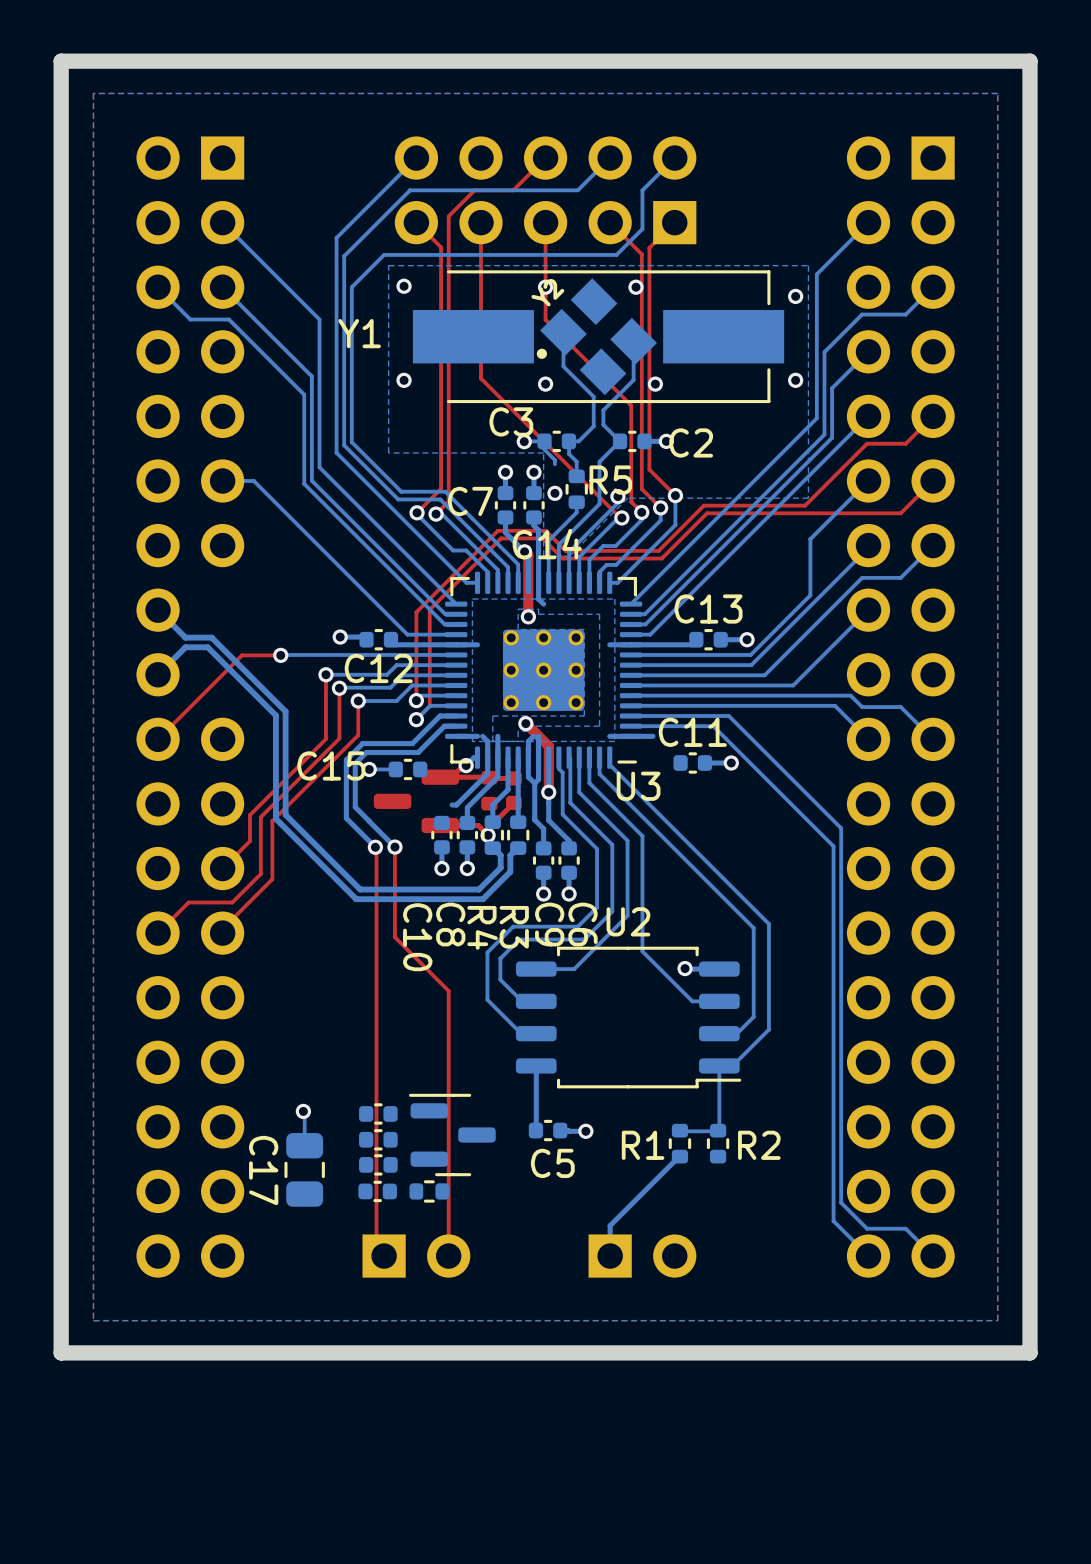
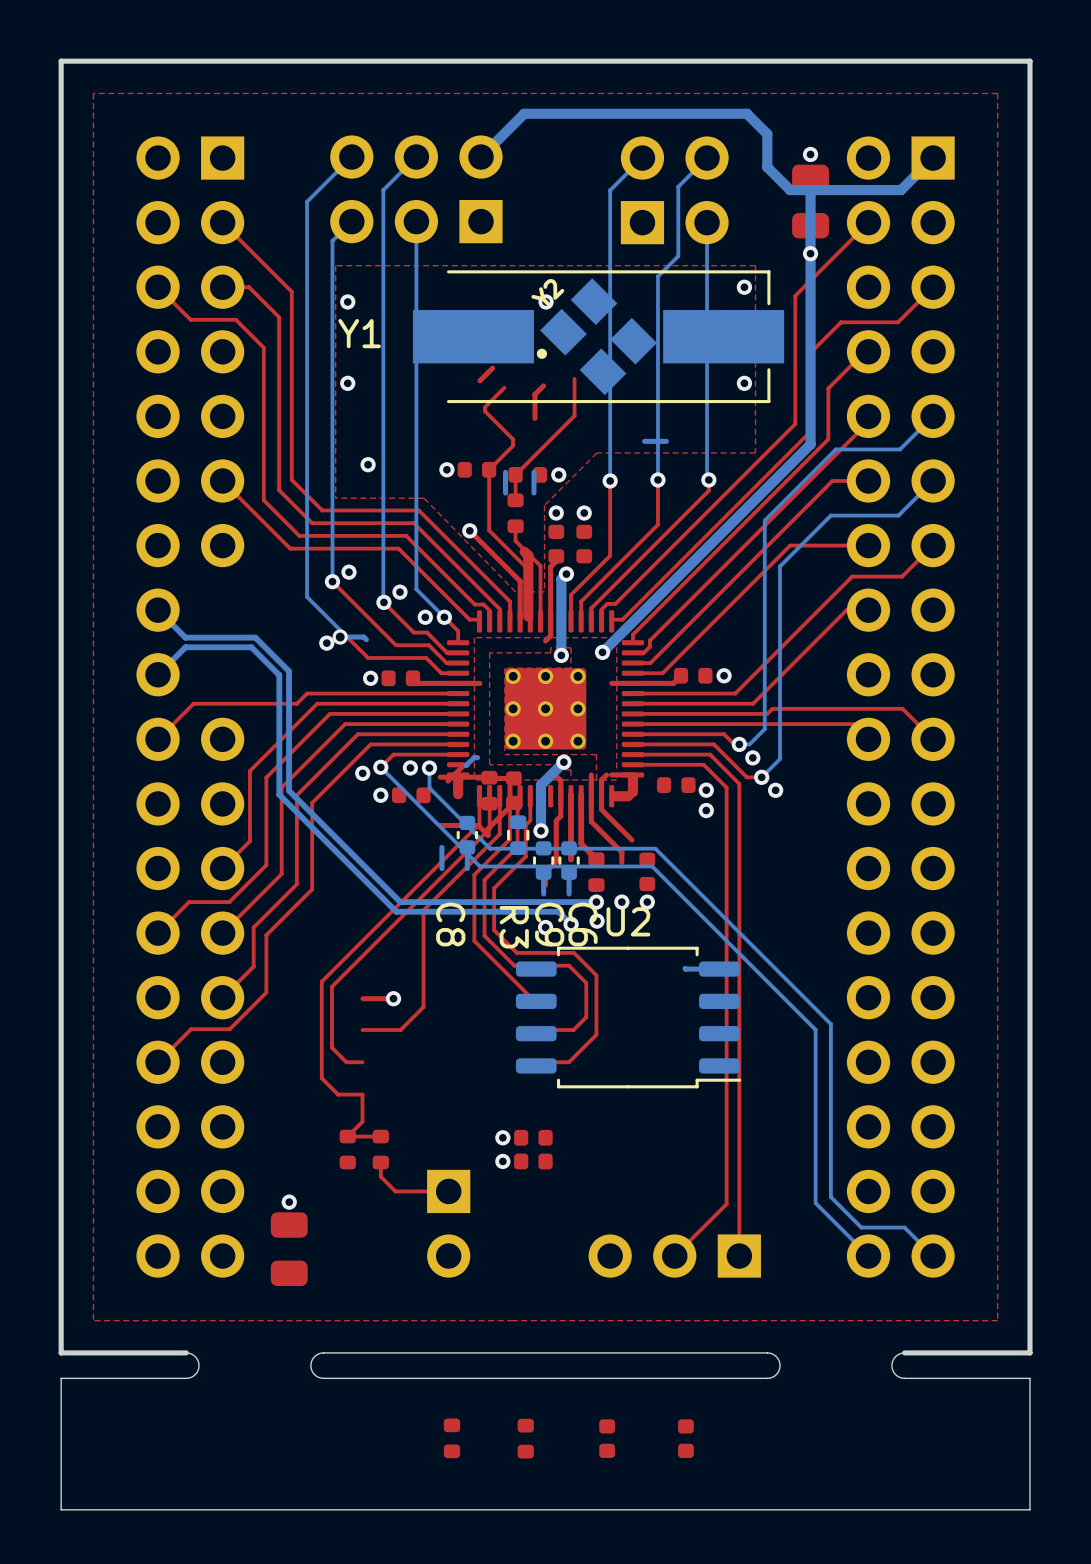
bottom zone outline: (997, 93) (997, 1320) (93, 1320) (93, 93) (997, 93) -> none
via: none -> (810, 154)
bottom track: none -> (351, 157) (307, 201) (307, 596) (342, 632)
bottom track: none -> (480, 157) (524, 113) (746, 113) (767, 134) (767, 167) (790, 190) (901, 190) (933, 158)
bottom track: (416, 158) (336, 237) (336, 452) (466, 582) (477, 582) -> (416, 157) (383, 190) (383, 602)
top track: (545, 158) (513, 190) (474, 190) (448, 216) (448, 501) (436, 514) -> none
bottom track: (610, 158) (577, 190) (410, 190) (344, 256) (344, 445) (398, 499) (440, 499) (508, 567) (508, 582) -> none
bottom track: none -> (642, 158) (610, 190) (610, 480)
bottom track: (674, 158) (642, 190) (642, 229) (616, 254) (384, 254) (351, 287) (351, 442) (401, 491) (445, 491) (518, 564) (518, 582) -> none
bottom track: none -> (707, 158) (678, 186) (678, 256) (657, 276) (657, 479)
part: none -> (416, 189)
part: (545, 190) -> none
part: none -> (674, 190)
bottom track: none -> (810, 190) (810, 444) (602, 652)
part: none -> (810, 201)
bottom track: none -> (351, 221) (332, 240) (332, 581)
bottom track: none -> (416, 221) (416, 589) (444, 617)
top track: none -> (222, 222) (291, 291) (291, 479) (322, 510) (418, 510) (509, 601) (509, 619)
bottom track: (222, 222) (319, 319) (319, 467) (456, 604) -> none
top track: (416, 222) (441, 247) (441, 488) (417, 512) -> none
top track: (480, 222) (480, 378) (621, 517) -> none
top track: (545, 222) (545, 319) (631, 405) (631, 501) (641, 512) -> none
top track: (610, 222) (641, 254) (641, 489) (660, 507) -> none
top track: (674, 222) (649, 247) (649, 469) (675, 495) -> none
bottom track: none -> (707, 222) (707, 478) (708, 479)
top track: none -> (868, 222) (795, 295) (795, 424) (615, 603) (607, 603) (601, 609) (601, 619)
bottom track: (868, 222) (816, 274) (816, 418) (631, 604) -> none
via: none -> (810, 253)
top zone outline: none -> (755, 265) (755, 452) (596, 452) (544, 505) (544, 591) (515, 591) (424, 498) (335, 498) (335, 265) (755, 265)
bottom zone outline: (808, 265) (388, 265) (388, 452) (543, 452) (543, 556) (569, 556) (627, 498) (808, 498) (808, 265) -> none
via: (404, 286) -> none
top track: none -> (158, 287) (190, 319) (235, 319) (263, 347) (263, 500) (299, 535) (406, 535) (474, 604) (483, 604) (489, 610) (489, 619)
bottom track: (158, 287) (190, 319) (229, 319) (304, 394) (304, 483) (444, 624) (456, 624) -> none
top track: none -> (222, 287) (249, 287) (279, 317) (279, 490) (312, 523) (413, 523) (499, 609) (499, 619)
bottom track: (222, 287) (311, 376) (311, 480) (445, 614) (456, 614) -> none
via position: (545, 287) -> (546, 301)
via: (636, 287) -> none
via: none -> (744, 287)
top track: none -> (933, 287) (898, 322) (841, 322) (813, 350) (813, 429) (622, 619) (611, 619)
bottom track: (933, 287) (905, 314) (862, 314) (824, 352) (824, 434) (644, 614) (631, 614) -> none
via: (795, 296) -> none
via: none -> (347, 301)
bottom track: (563, 332) (563, 366) (593, 396) (593, 426) (578, 441) (569, 441) (569, 454) (576, 461) (576, 476) -> none
bottom track: (633, 341) (633, 380) (603, 410) (603, 424) (619, 441) (599, 461) (599, 503) (558, 544) (558, 582) -> none
top track: none -> (868, 351) (864, 351) (828, 388) (828, 439) (632, 634) (632, 642)
bottom track: (868, 351) (832, 388) (832, 437) (645, 624) (631, 624) -> none
top track: none -> (492, 368) (479, 380)
top track: none -> (574, 378) (574, 415) (515, 474) (515, 500)
via: (404, 380) -> none
via: (795, 380) -> none
via: none -> (347, 383)
via: none -> (744, 383)
via: (545, 384) -> none
via: (655, 384) -> none
top track: none -> (543, 385) (534, 394) (534, 418)
top track: none -> (504, 387) (485, 407) (485, 411) (513, 439) (513, 445) (489, 469) (489, 530) (530, 571)
top track: none -> (868, 416) (868, 422) (649, 640) (649, 646) (643, 652) (632, 652)
bottom track: (868, 416) (650, 634) (631, 634) -> none
top track: (933, 416) (905, 443) (867, 443) (856, 454) -> none
bottom track: none -> (933, 416) (900, 449) (835, 449) (764, 520) (764, 729) (749, 744) (739, 744)
bottom track: (524, 441) (544, 441) (544, 449) (554, 460) (554, 464) -> none
via: (524, 441) -> none
C3 side: bottom (556, 441) -> top (527, 474)
C2 side: bottom (632, 441) -> top (476, 469)
via: (666, 441) -> none
top track: (855, 455) (805, 505) (703, 505) (658, 550) (565, 550) (545, 530) (497, 530) (416, 612) (416, 700) -> none
via: none -> (368, 464)
via: none -> (446, 469)
via: (505, 472) -> none
via: (533, 472) -> none
via: none -> (558, 474)
top track: none -> (657, 479) (657, 524) (581, 601) (581, 621)
via: none -> (657, 479)
top track: none -> (708, 479) (708, 490) (591, 608) (591, 621)
via: none -> (708, 479)
top track: none -> (222, 480) (290, 548) (398, 548) (469, 619) (479, 619)
bottom track: (222, 480) (253, 480) (407, 634) (456, 634) -> none
top track: none -> (610, 480) (610, 555) (571, 594) (571, 621)
via: none -> (610, 480)
top track: none -> (868, 480) (832, 480) (650, 663) (632, 663)
bottom track: (868, 480) (810, 539) (810, 595) (750, 654) (631, 654) -> none
top track: (933, 480) (900, 513) (707, 513) (661, 558) (562, 558) (542, 538) (501, 538) (429, 609) (429, 706) (416, 719) -> none
bottom track: none -> (933, 480) (898, 515) (830, 515) (780, 566) (780, 759) (761, 777)
R5 side: bottom (576, 489) -> top (515, 513)
via: (554, 493) -> none
bottom track: (675, 495) (675, 525) (617, 582) (609, 582) -> none
via: (675, 495) -> none
bottom track: (617, 496) (617, 503) (569, 551) (569, 582) -> none
via: (617, 496) -> none
bottom track: (576, 501) (576, 512) (548, 540) (548, 582) -> none
C7 side: bottom (505, 505) -> top (584, 544)
C14 side: bottom (533, 505) -> top (556, 544)
bottom track: (660, 507) (660, 520) (616, 564) (606, 564) (599, 571) (599, 582) -> none
via: (660, 507) -> none
bottom track: (417, 512) (453, 550) (466, 550) (487, 571) (487, 582) -> none
via: (417, 512) -> none
bottom track: (641, 512) (641, 519) (615, 546) (603, 546) (589, 559) (589, 582) -> none
via: (641, 512) -> none
via: none -> (556, 513)
via: none -> (584, 513)
bottom track: (436, 514) (442, 514) (497, 569) (497, 582) -> none
via: (436, 514) -> none
bottom track: (505, 517) (505, 532) (528, 555) (528, 582) -> none
bottom track: (533, 517) (533, 525) (538, 530) (538, 599) (543, 604) -> none
bottom track: (621, 517) (618, 517) (579, 557) (579, 582) -> none
via: (621, 517) -> none
top track: none -> (515, 526) (515, 541) (540, 565) (540, 619)
top track: none -> (469, 530) (520, 581) (520, 619)
via: none -> (469, 530)
top track: none -> (868, 545) (790, 545) (662, 673) (632, 673)
bottom track: (868, 545) (868, 547) (751, 665) (631, 665) -> none
top track: none -> (933, 545) (902, 576) (852, 576) (735, 693) (632, 693)
bottom track: (933, 545) (900, 577) (862, 577) (764, 675) (631, 675) -> none
via: (524, 551) -> none
top track: none -> (556, 556) (556, 561) (550, 566) (550, 635) (545, 640)
via: none -> (349, 572)
bottom track: none -> (566, 574) (561, 579) (561, 655)
via: none -> (566, 574)
top track: none -> (332, 581) (396, 645) (428, 645) (446, 663) (458, 663)
via: none -> (332, 581)
via: none -> (399, 592)
bottom zone outline: (614, 599) (472, 599) (472, 741) (614, 741) (614, 599) -> none
top track: none -> (383, 602) (413, 632) (426, 632) (447, 652) (458, 652)
via: none -> (383, 602)
top track: none -> (868, 610) (846, 610) (753, 703) (632, 703)
bottom track: (868, 610) (793, 685) (631, 685) -> none
via: (528, 616) -> none
via: none -> (425, 617)
top track: none -> (444, 617) (458, 631) (458, 642)
via: none -> (444, 617)
top track: none -> (342, 632) (368, 657) (426, 657) (441, 673) (458, 673)
bottom track: (211, 637) (285, 711) (285, 814) (360, 889) (478, 889) (500, 867) (500, 855) (492, 847) -> (211, 637) (255, 637) (289, 671) (289, 790) (400, 902) (596, 902)
top zone outline: none -> (616, 637) (474, 637) (474, 780) (616, 780) (616, 637)
C12 side: bottom (378, 639) -> top (693, 675)
bottom track: (391, 639) (396, 644) (477, 644) -> none
bottom track: (696, 639) (691, 644) (609, 644) -> none
C13 side: bottom (708, 639) -> top (400, 678)
bottom track: (747, 639) (720, 639) -> none
via: (747, 639) -> none
via: none -> (326, 643)
bottom track: (207, 647) (275, 715) (275, 818) (356, 899) (482, 899) (510, 871) (510, 855) (518, 847) -> (207, 647) (251, 647) (279, 675) (279, 794) (396, 911) (558, 911) (571, 924)
via: none -> (602, 652)
bottom track: (456, 654) (280, 655) -> none
top track: (280, 655) (242, 655) (193, 703) -> (458, 693) (307, 693) (296, 703) (193, 703)
via: (280, 655) -> none
via: none -> (561, 655)
bottom track: (456, 665) (396, 665) (387, 674) (325, 674) -> none
U3 side: bottom (543, 670) -> top (545, 708)
top track: (325, 674) (325, 739) (249, 815) -> (458, 703) (317, 703) (249, 771) (249, 815)
via: (325, 674) -> none
bottom track: (456, 675) (402, 675) (390, 687) (339, 688) -> none
top track: none -> (680, 675) (673, 683) (611, 683)
via: none -> (724, 675)
via: none -> (370, 678)
top track: none -> (479, 683) (412, 683)
bottom track: (456, 685) (412, 685) (396, 701) (358, 701) -> none
top track: (339, 688) (339, 738) (260, 817) (260, 873) (232, 902) (188, 902) -> (458, 713) (329, 713) (266, 777) (266, 865) (229, 902) (188, 902)
via: (339, 688) -> none
bottom track: (456, 695) (421, 695) (416, 700) -> none
bottom track: (631, 695) (850, 695) (862, 707) (900, 707) (933, 739) -> none
via: (416, 700) -> none
top track: (358, 701) (358, 735) (272, 821) (272, 879) (222, 928) (222, 933) -> (458, 724) (345, 724) (281, 787) (281, 874) (222, 933)
via: (358, 701) -> none
bottom track: (456, 705) (430, 705) (416, 719) -> none
bottom track: (631, 705) (835, 705) (868, 739) -> none
top track: none -> (632, 713) (767, 713) (772, 708) (902, 708) (933, 739)
bottom track: (456, 716) (440, 716) (412, 743) (362, 743) (346, 759) (346, 818) (375, 847) -> none
bottom track: (631, 716) (728, 716) (841, 828) (841, 1202) (867, 1228) (905, 1228) -> (429, 768) (429, 788) (490, 848) (655, 848) (830, 1024) (830, 1197) (861, 1227) (905, 1228)
via: (416, 719) -> none
via: (525, 723) -> none
top track: (526, 723) (548, 746) (548, 792) -> none
top track: none -> (632, 724) (853, 724) (868, 739)
bottom track: (456, 726) (444, 726) (418, 752) (366, 752) (355, 763) (355, 807) (369, 821) -> none
bottom track: (631, 726) (713, 726) (833, 846) (833, 1221) -> (380, 767) (479, 866) (652, 866) (815, 1029) (815, 1203) (833, 1221)
top track: none -> (458, 734) (357, 734) (296, 795) (296, 884) (253, 927) (253, 966) (222, 997)
top track: none -> (632, 734) (724, 734) (734, 744) (739, 744)
bottom track: (477, 736) (456, 736) -> none
bottom track: (482, 736) (487, 741) (487, 773) (456, 805) (452, 805) -> none
bottom track: (497, 736) (497, 777) (467, 807) (467, 822) -> none
bottom track: (533, 736) (528, 741) (528, 777) (534, 783) -> none
bottom track: (538, 736) (538, 779) (534, 783) -> none
bottom track: (652, 736) (609, 736) -> none
bottom zone outline: (518, 741) (518, 731) (528, 731) (528, 726) (599, 726) (599, 614) (538, 614) (538, 609) (518, 609) (518, 629) (584, 629) (584, 716) (492, 716) (492, 741) -> none
top track: none -> (458, 744) (370, 744) (312, 802) (312, 889) (266, 935) (266, 992) (229, 1029) (191, 1029) (158, 1062)
top track: none -> (632, 744) (713, 744) (746, 777) (761, 777)
via: none -> (739, 744)
top track: none -> (458, 754) (393, 754) (380, 767)
top track: none -> (632, 754) (710, 754) (739, 783) (739, 1256)
bottom track: (609, 755) (609, 764) (768, 923) (768, 1029) (732, 1065) (719, 1065) (719, 1130) (679, 1131) -> none
bottom track: (508, 757) (508, 789) (492, 805) (492, 822) -> none
bottom track: (518, 757) (518, 822) -> none
bottom track: (548, 757) (548, 820) (569, 840) (569, 848) -> none
bottom track: (558, 757) (558, 768) (562, 772) (562, 814) (597, 848) (597, 907) (577, 926) (513, 926) (487, 952) (487, 999) (521, 1033) (536, 1033) -> none
bottom track: (569, 757) (570, 802) (612, 844) (612, 911) (584, 939) (519, 939) (500, 958) (500, 979) (522, 1001) (536, 1001) -> none
bottom track: (579, 757) (579, 792) (627, 840) (627, 915) (574, 969) (536, 969) -> none
bottom track: (589, 757) (589, 783) (642, 836) (642, 951) (692, 1001) (719, 1001) -> none
bottom track: (599, 757) (599, 773) (753, 928) (753, 1016) (736, 1033) (719, 1033) -> none
via: none -> (752, 757)
bottom track: none -> (563, 762) (541, 785) (541, 830)
via: none -> (563, 762)
C11: (692, 762) -> none
bottom track: (731, 762) (705, 762) -> none
via: (731, 762) -> none
top track: none -> (632, 764) (703, 764) (726, 787) (726, 1204) (674, 1256)
via: (466, 765) -> none
via: none -> (380, 767)
via: none -> (410, 767)
via: none -> (429, 768)
via: (369, 769) -> none
part footprint: [373, 769, 460, 834] -> [391, 787, 431, 804]
bottom track: (395, 769) (369, 769) -> none
C15 side: bottom (408, 769) -> top (676, 785)
via: none -> (362, 773)
top track: none -> (591, 774) (591, 821) (621, 852) (621, 862)
top track: none -> (606, 774) (601, 780) (601, 809) (632, 840)
top track: none -> (633, 774) (611, 774)
top track: none -> (555, 775) (560, 780) (560, 816) (556, 820) (556, 861) (545, 872) (545, 885)
top track: none -> (458, 777) (458, 794)
top track: none -> (632, 777) (632, 792)
via: none -> (761, 777)
top zone outline: none -> (596, 780) (596, 754) (504, 754) (504, 668) (571, 668) (571, 647) (550, 647) (550, 652) (489, 652) (489, 764) (560, 764) (560, 769) (571, 769) (571, 780)
bottom track: (534, 783) (534, 819) (543, 828) (543, 848) -> none
via: none -> (706, 790)
via: none -> (775, 790)
top track: none -> (530, 792) (530, 820) (525, 825) (525, 856) (494, 888) (494, 930) (516, 952) (574, 952) (596, 975) (596, 1034) (568, 1062) (545, 1062)
via: (548, 792) -> none
top track: none -> (479, 794) (479, 824) (321, 981) (321, 1078) (338, 1094) (362, 1094) (362, 1121) (347, 1136) (380, 1136)
top track: none -> (489, 794) (489, 829) (331, 986) (331, 1047) (346, 1062) (362, 1062)
top track: none -> (499, 794) (499, 834) (423, 910) (423, 1007) (400, 1029) (362, 1029)
top track: none -> (509, 794) (509, 839) (474, 874) (474, 940) (531, 997) (545, 997)
top track: none -> (520, 794) (520, 807) (517, 809) (517, 846) (484, 879) (484, 935) (514, 965) (568, 965) (586, 982) (586, 1017) (573, 1029) (545, 1029)
top track: none -> (571, 794) (571, 859)
top track: none -> (581, 794) (581, 843) (596, 859)
via: none -> (380, 795)
top track: none -> (628, 796) (614, 796)
via: none -> (706, 810)
bottom track: (369, 821) (394, 847) -> none
via: none -> (541, 830)
C10 side: bottom (441, 835) -> top (647, 871)
via: (488, 835) -> none
R4 side: bottom (492, 835) -> top (596, 872)
top track: (375, 847) (376, 1248) (378, 1250) -> none
via: (375, 847) -> none
top track: (394, 847) (394, 937) (448, 990) (448, 1256) -> none
via: (394, 847) -> none
via: (441, 868) -> none
via: (467, 868) -> none
via: (543, 894) -> none
via: (569, 894) -> none
via: none -> (596, 902)
via: none -> (621, 902)
via: none -> (647, 902)
via: none -> (597, 921)
via: none -> (571, 924)
via: none -> (545, 927)
via: (685, 968) -> none
top track: none -> (393, 998) (363, 998)
via: none -> (393, 998)
bottom track: (536, 1065) (535, 1130) -> none
via: (303, 1111) -> none
part: (378, 1113) -> none
bottom track: (304, 1115) (304, 1147) -> none
C5 side: bottom (548, 1130) -> top (533, 1137)
bottom track: (560, 1130) (585, 1131) -> none
via: (585, 1131) -> none
part: (452, 1135) -> none
via: none -> (502, 1137)
part side: bottom (378, 1139) -> top (685, 1438)
R1 side: bottom (679, 1143) -> top (380, 1149)
R2 side: bottom (718, 1143) -> top (347, 1149)
bottom track: (679, 1155) (610, 1225) (610, 1256) -> none
via: none -> (502, 1161)
part: none -> (533, 1161)
top track: none -> (380, 1162) (380, 1176) (395, 1191) (448, 1191)
part side: bottom (378, 1164) -> top (607, 1438)
C17: (304, 1169) -> none
part: (377, 1191) -> none
part: (429, 1191) -> none
via: none -> (289, 1202)
part: none -> (289, 1249)
part rotation: 0° (416, 1256) -> 90° clockwise (448, 1223)
part: (642, 1256) -> none
part: none -> (674, 1256)
board edge: (323, 1352) (186, 1352) -> (323, 1352) (315, 1356) (310, 1365) (314, 1374) (323, 1378) (767, 1378) (775, 1375) (780, 1365) (775, 1356) (767, 1352)
board edge width: thick (767, 1352) (323, 1352) -> thin (767, 1352) (323, 1352)
board edge: (904, 1352) (767, 1352) -> (904, 1352) (896, 1356) (892, 1364) (894, 1372) (901, 1377) (1029, 1378) (1029, 1509) (61, 1509) (61, 1378) (189, 1377) (196, 1372) (198, 1364) (194, 1356) (186, 1352)
board edge width: thick (904, 1352) (1029, 1352) (1029, 61) (61, 61) (61, 1352) (186, 1352) -> thin (904, 1352) (1029, 1352) (1029, 61) (61, 61) (61, 1352) (186, 1352)
part: none -> (452, 1438)
part: none -> (525, 1438)

